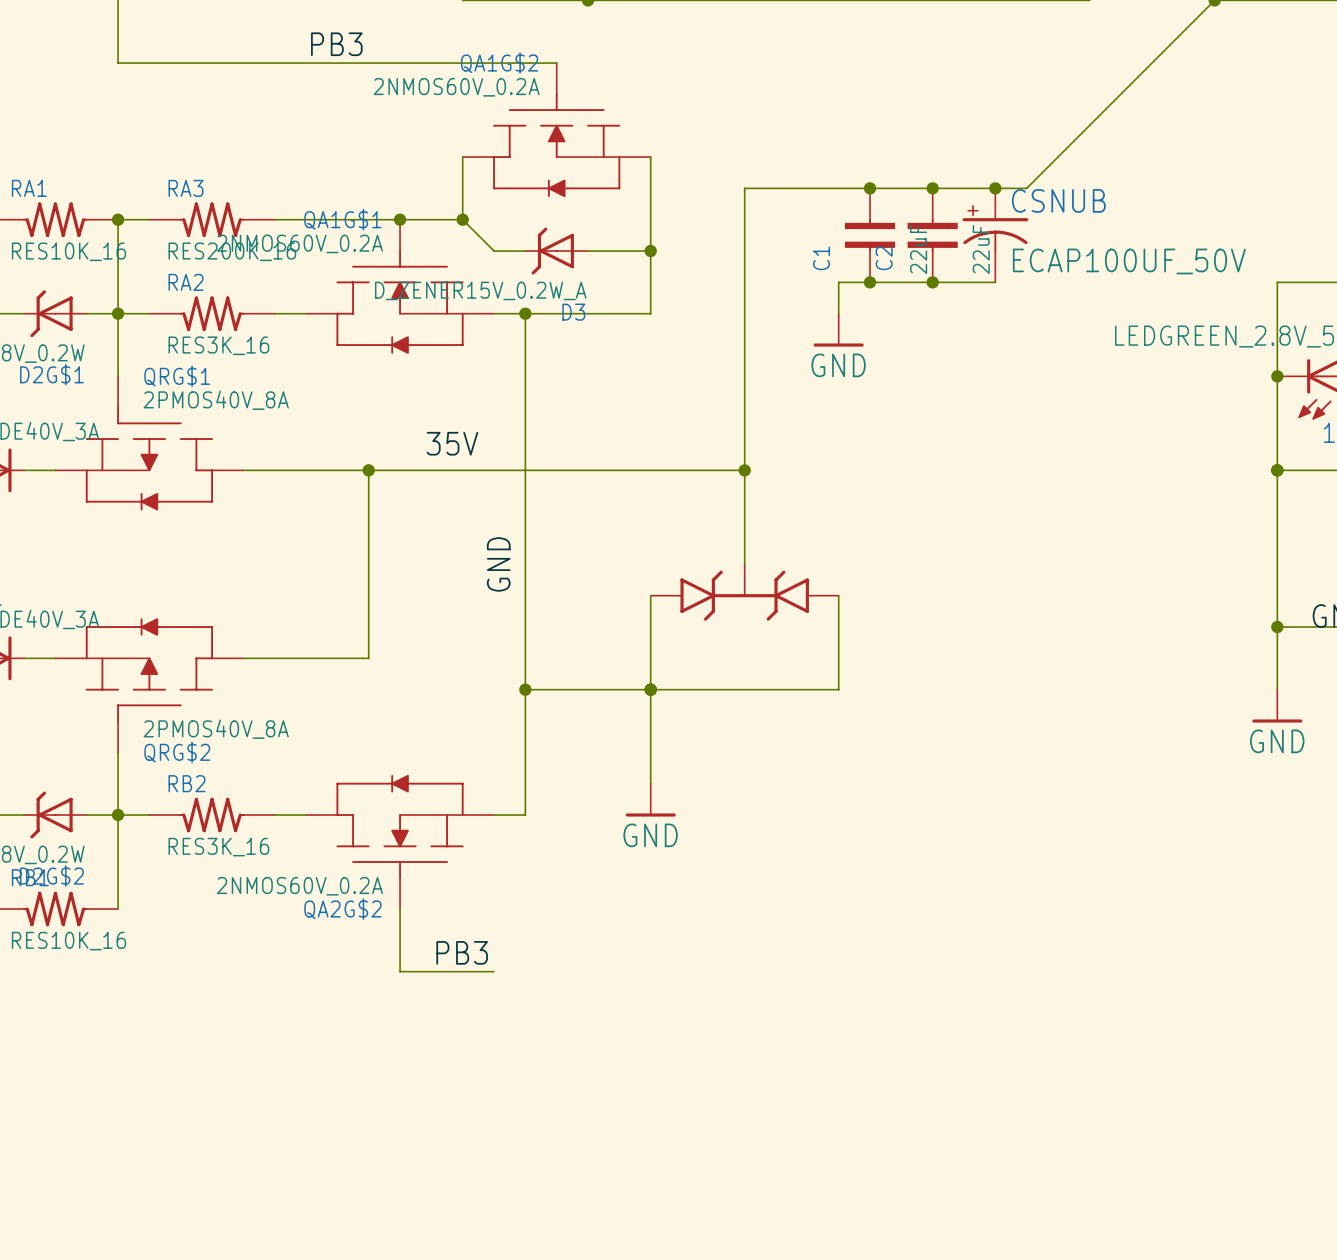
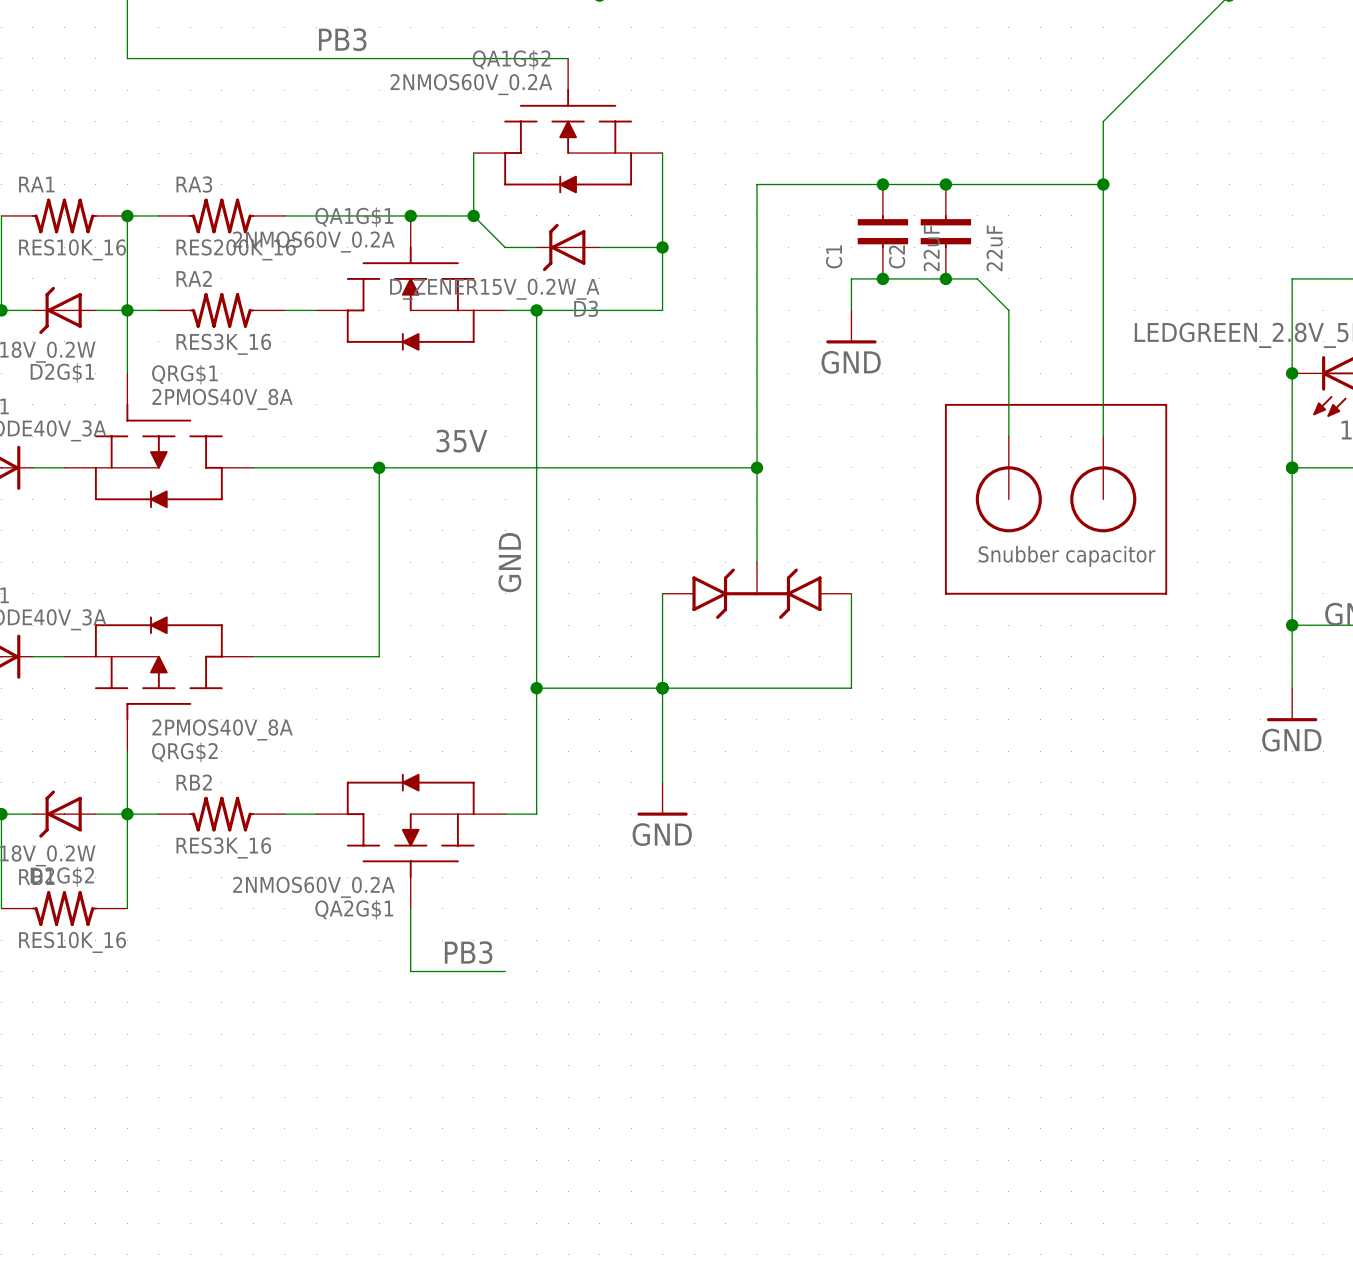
wire: (1089, 125) (1026, 188) -> (1103, 184) (1040, 184)
wire: none -> (1103, 121) (1103, 436)
junction: (995, 188) -> none
junction: none -> (1103, 184)
CSNUB: ECAP100UF_50V (995, 235) -> none
wire: (964, 282) (995, 282) -> (977, 278) (1008, 310) (1008, 436)
line: none -> (945, 404) (945, 593) (1166, 593) (1166, 404) (945, 404)
part: none -> (1008, 484)
part: none -> (1103, 484)
text: none -> Snubber capacitor (1067, 556)
QA2G$2 name: QA2G$2 (342, 909) -> QA2G$1 (354, 909)

